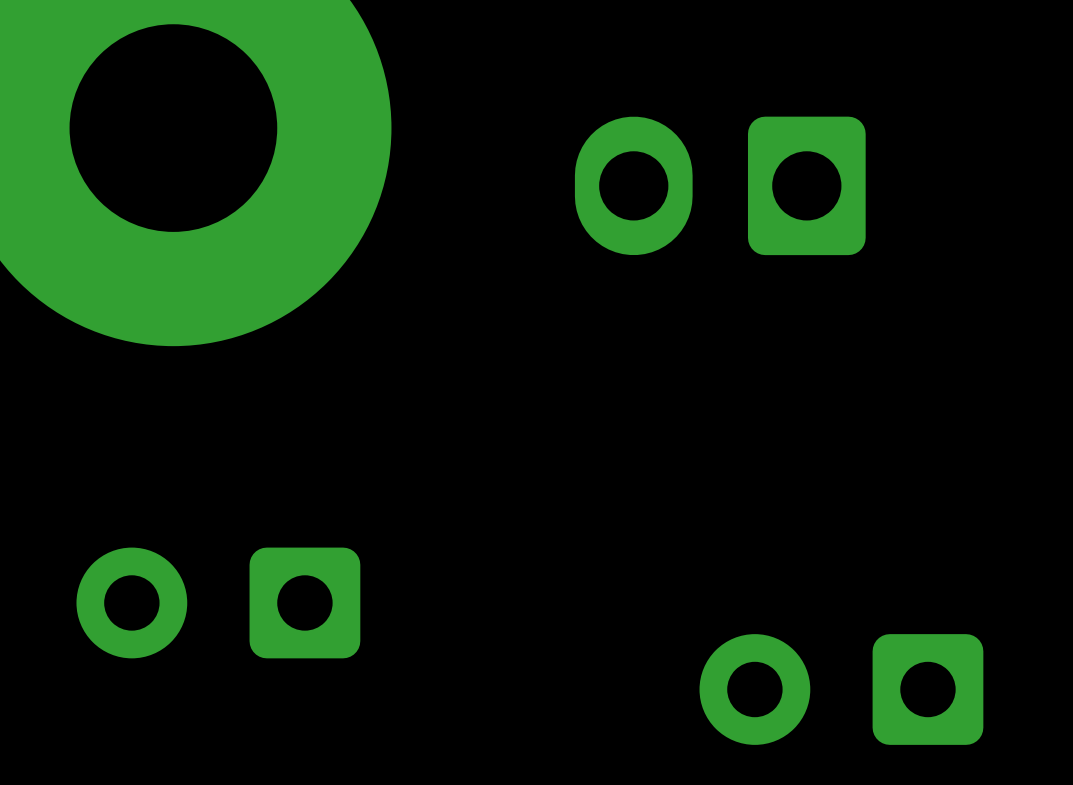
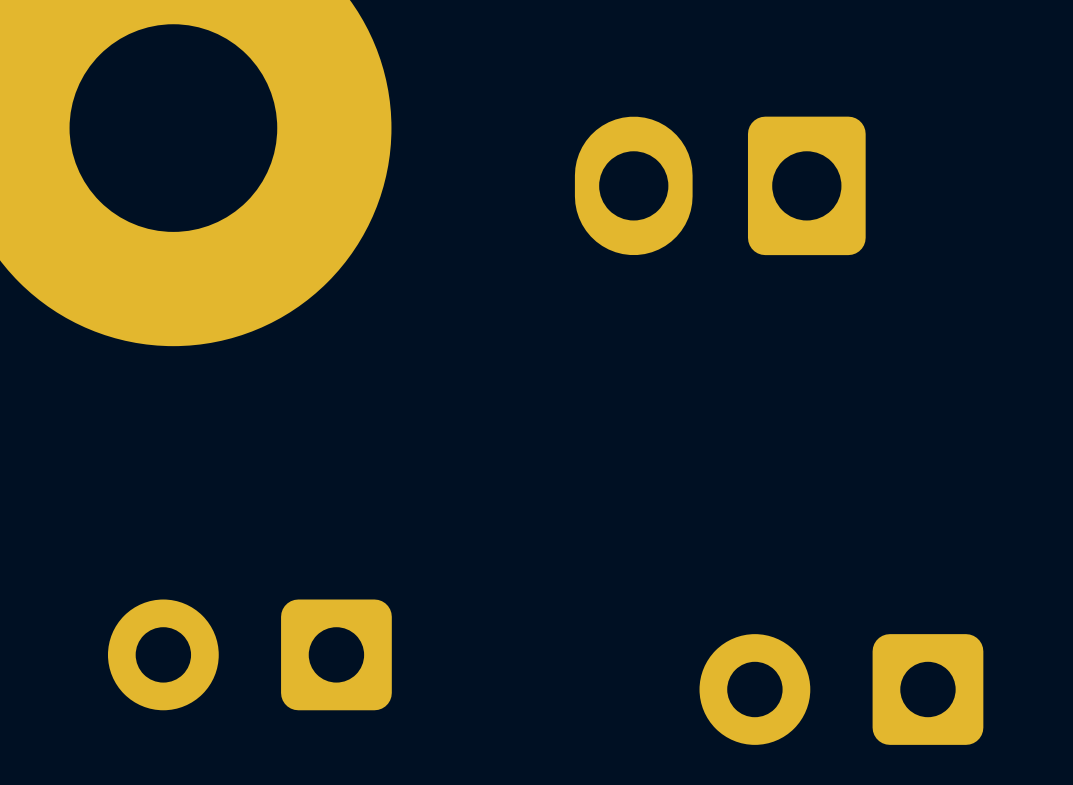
part position: (218, 602) -> (249, 654)

